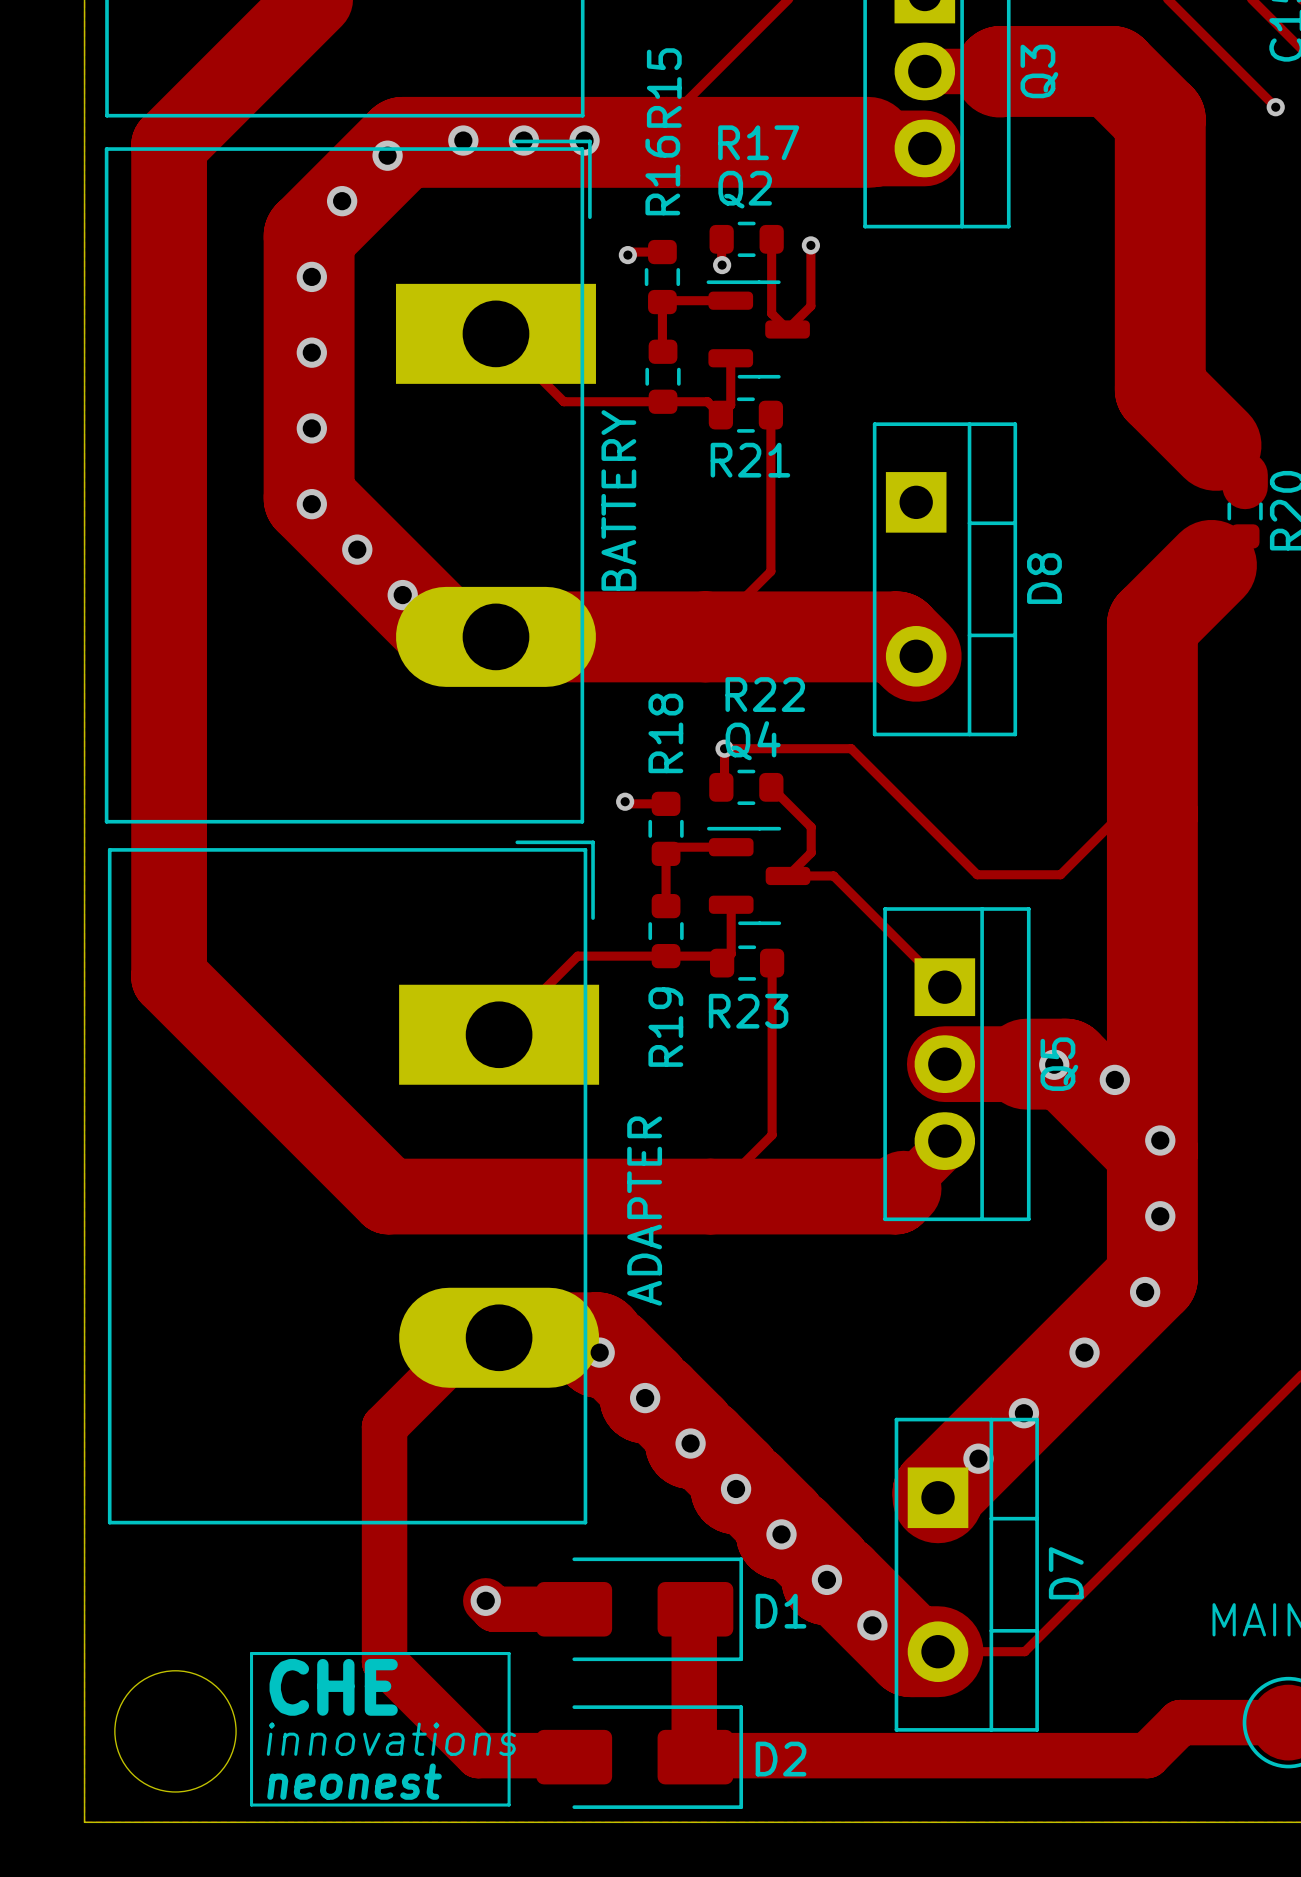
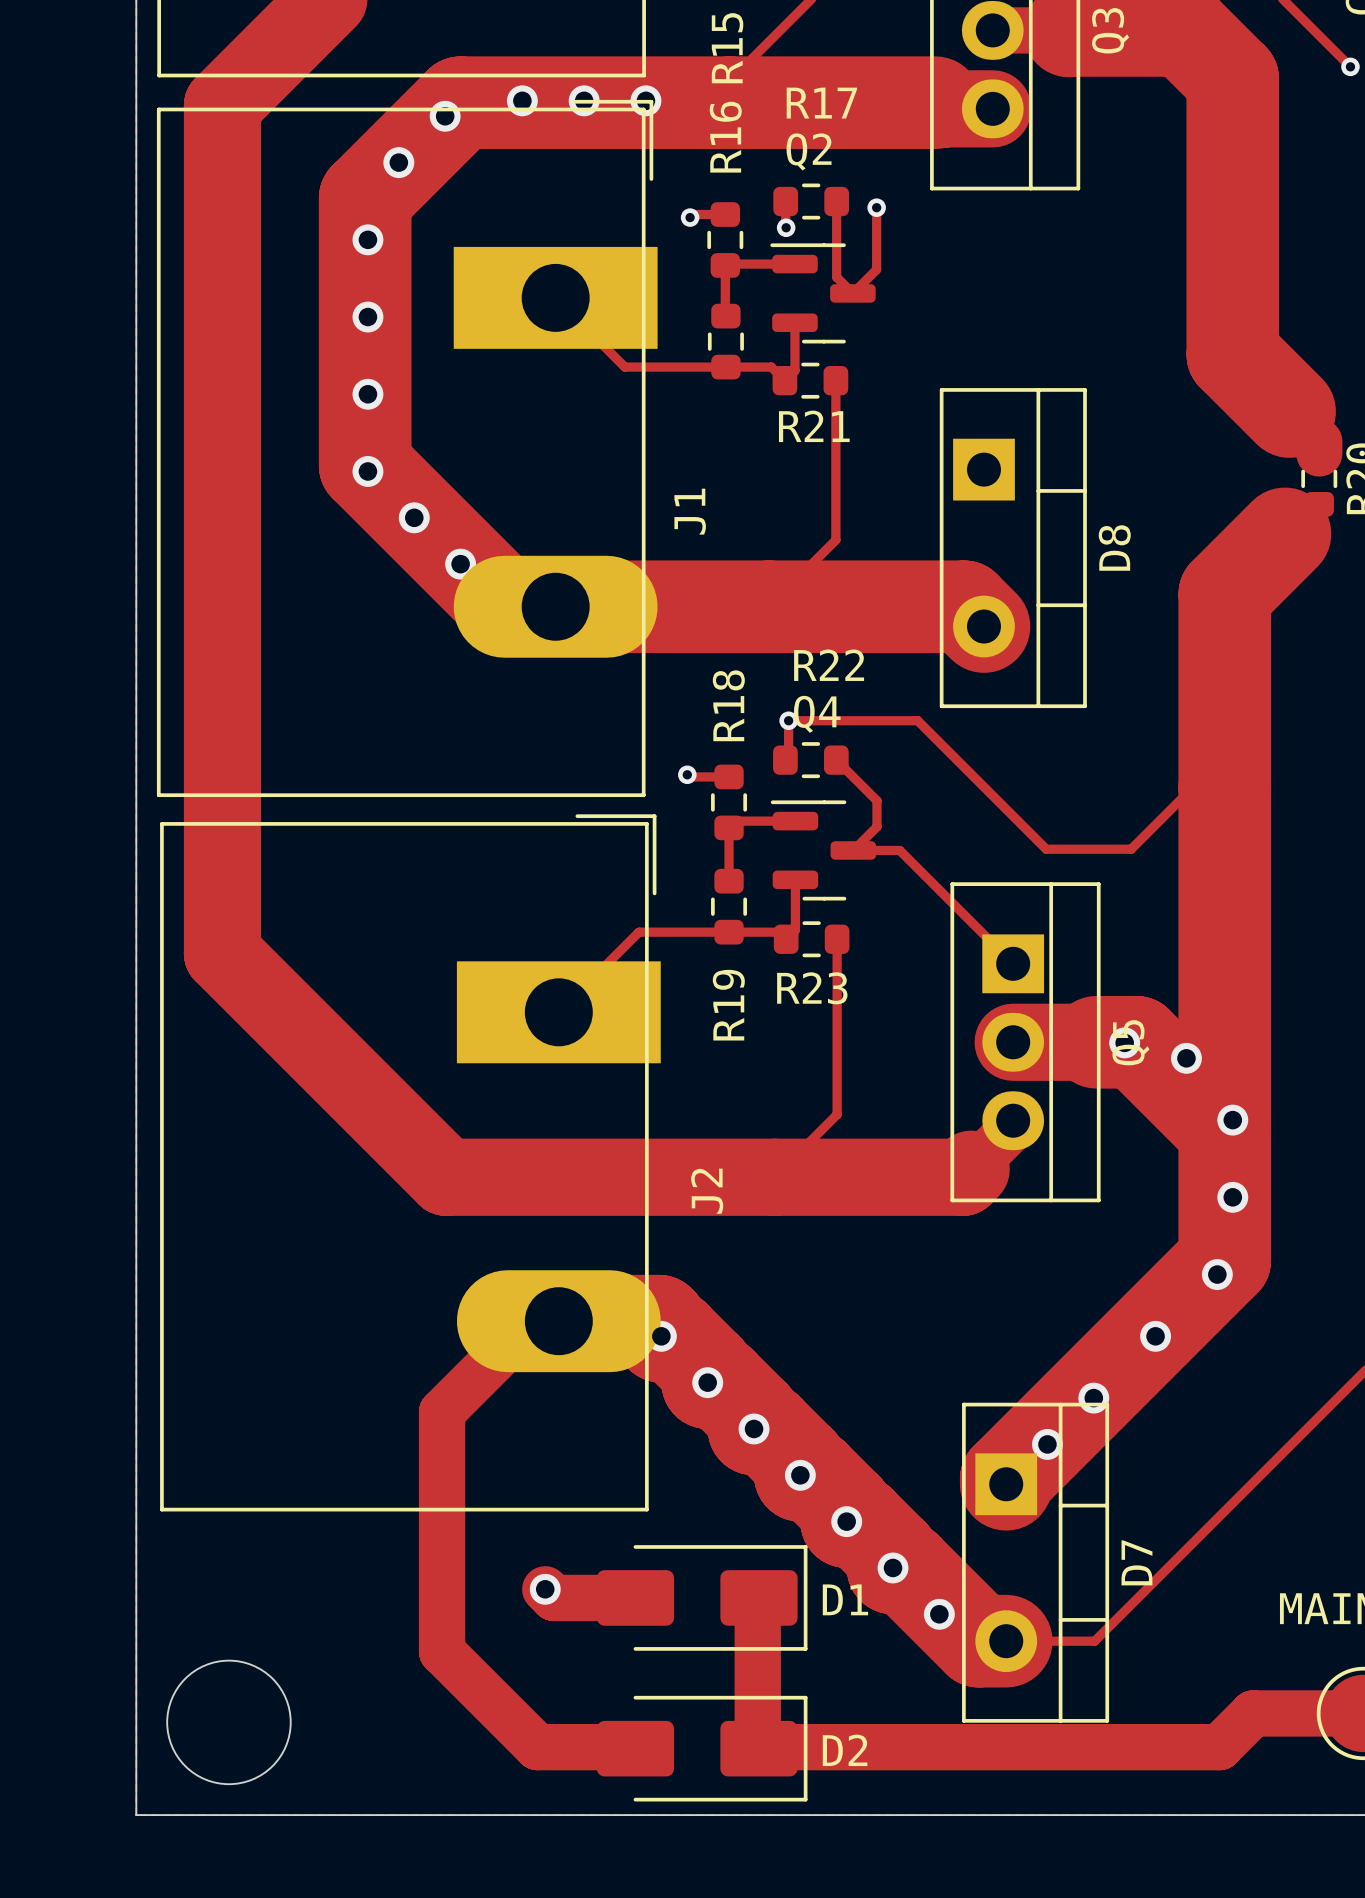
BATTERY name: BATTERY (618, 500) -> J1 (690, 511)
ADAPTER name: ADAPTER (644, 1211) -> J2 (707, 1191)
drawing: [250, 1652, 511, 1807] -> none

